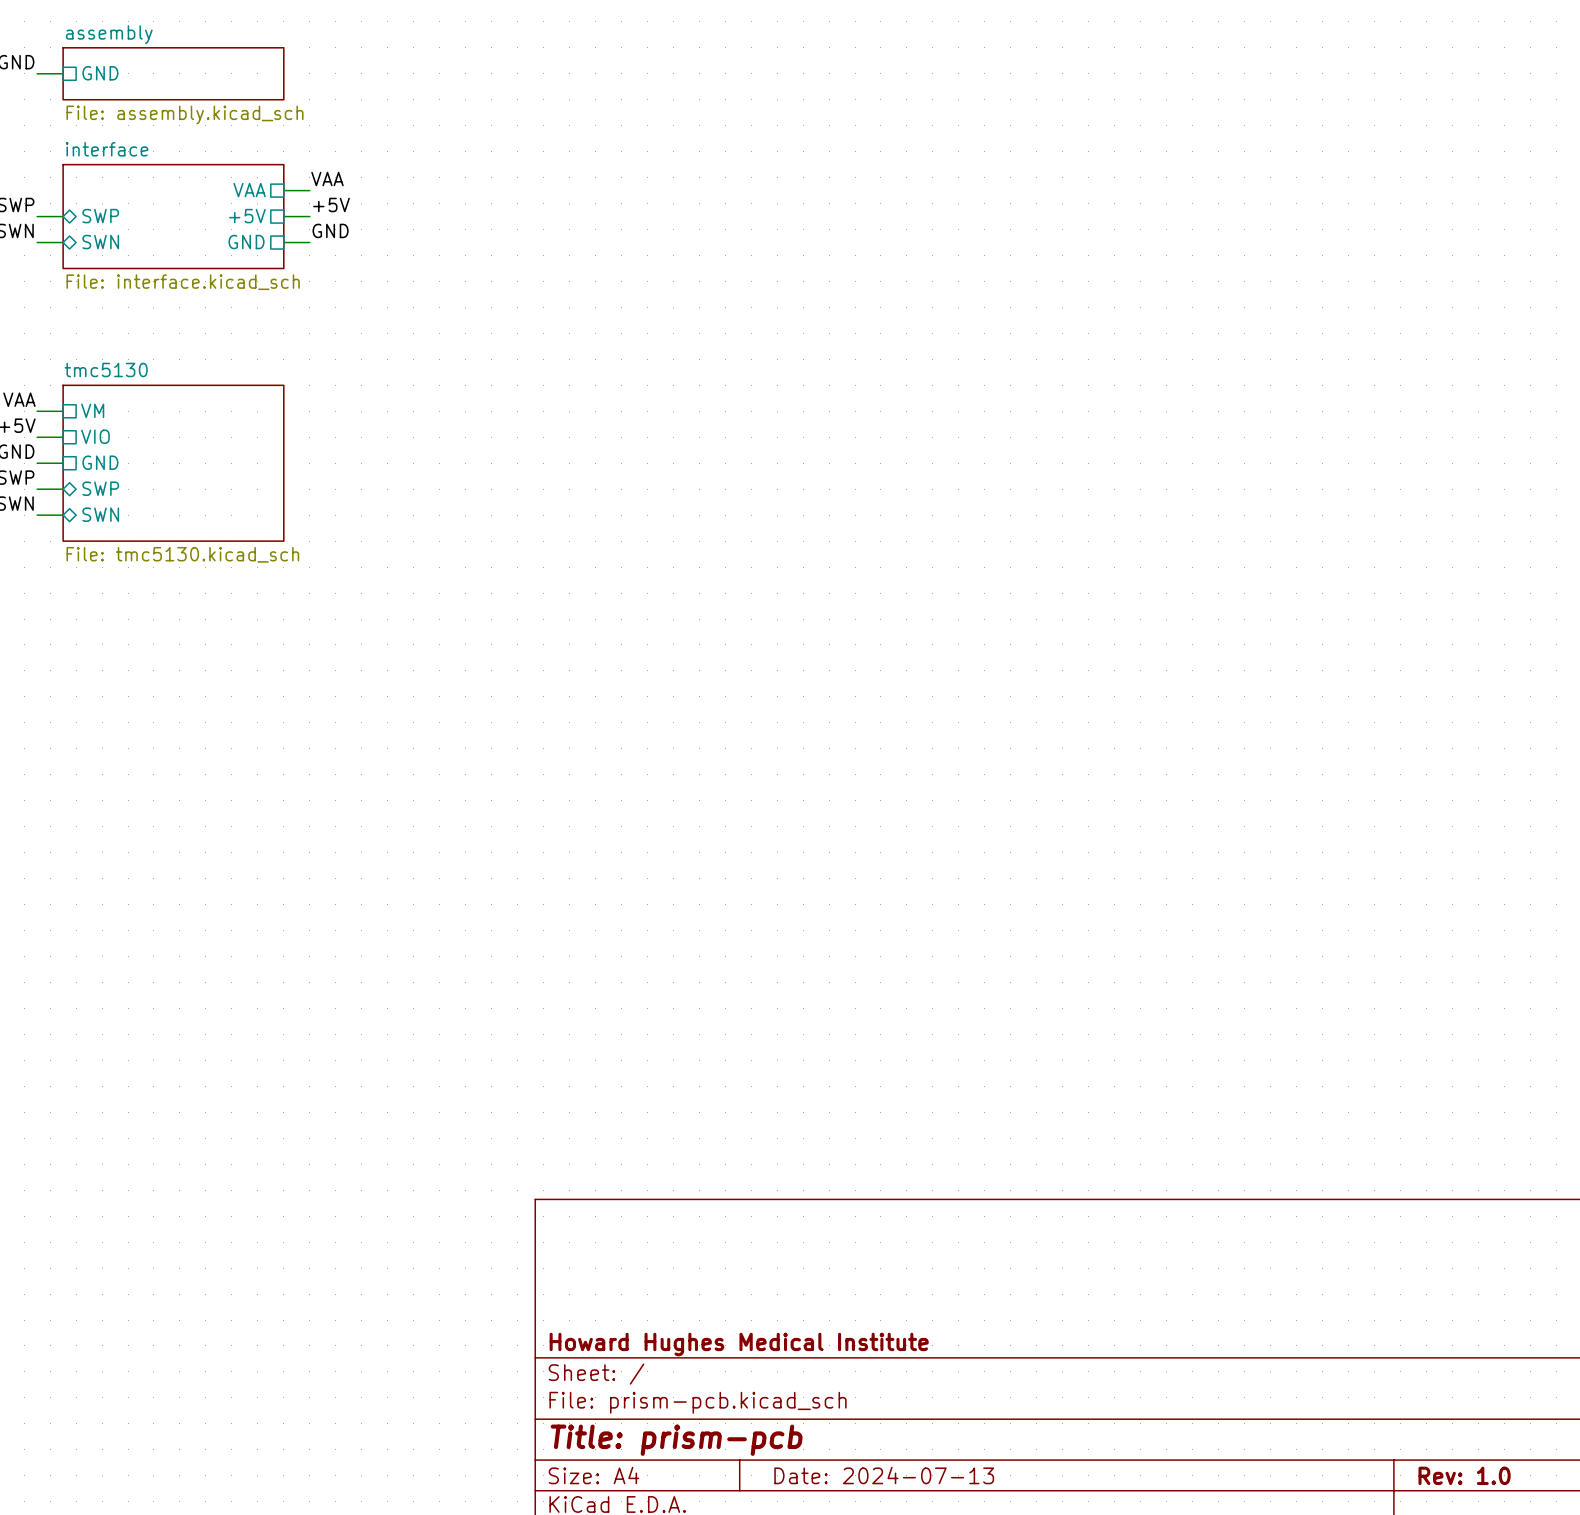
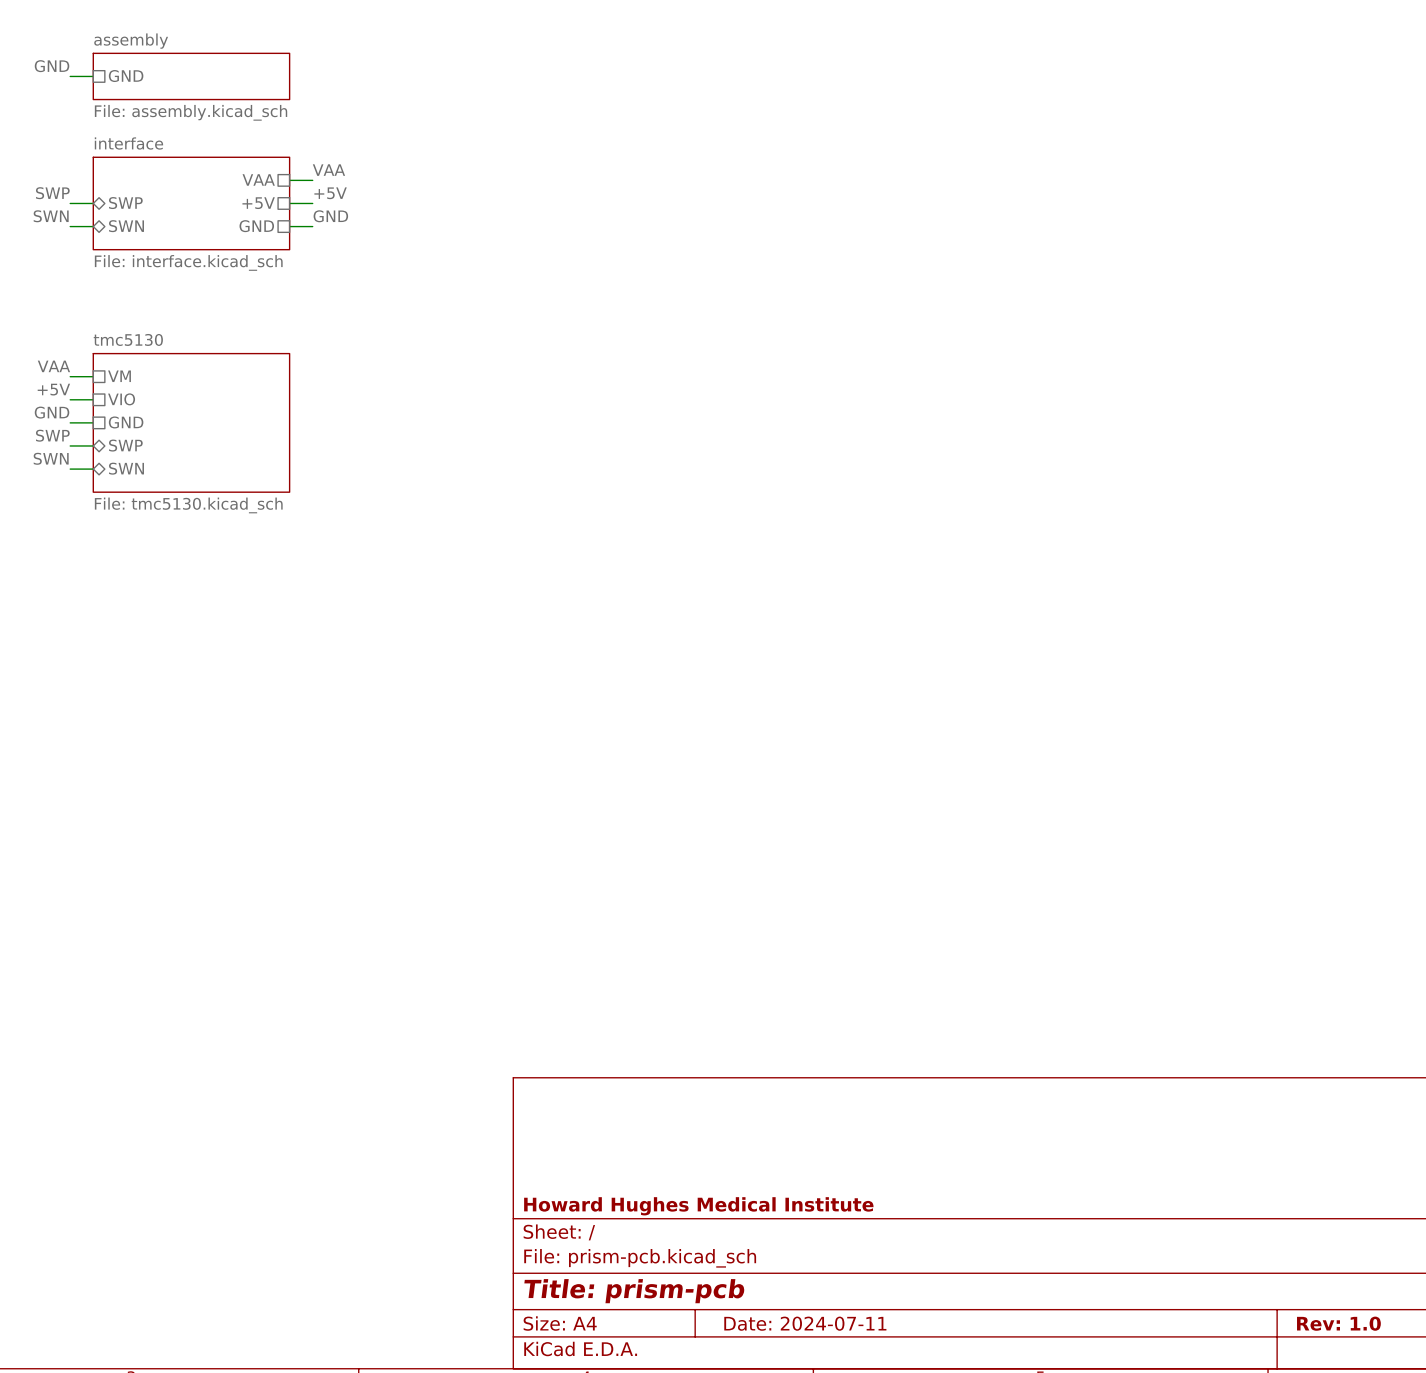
title block: Date: 2024-07-13 (884, 1475) -> Date: 2024-07-11 (805, 1323)

